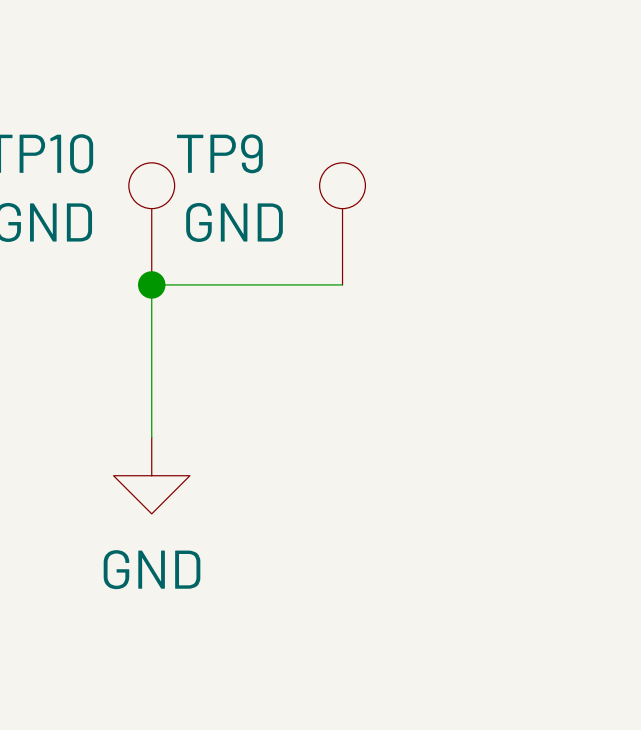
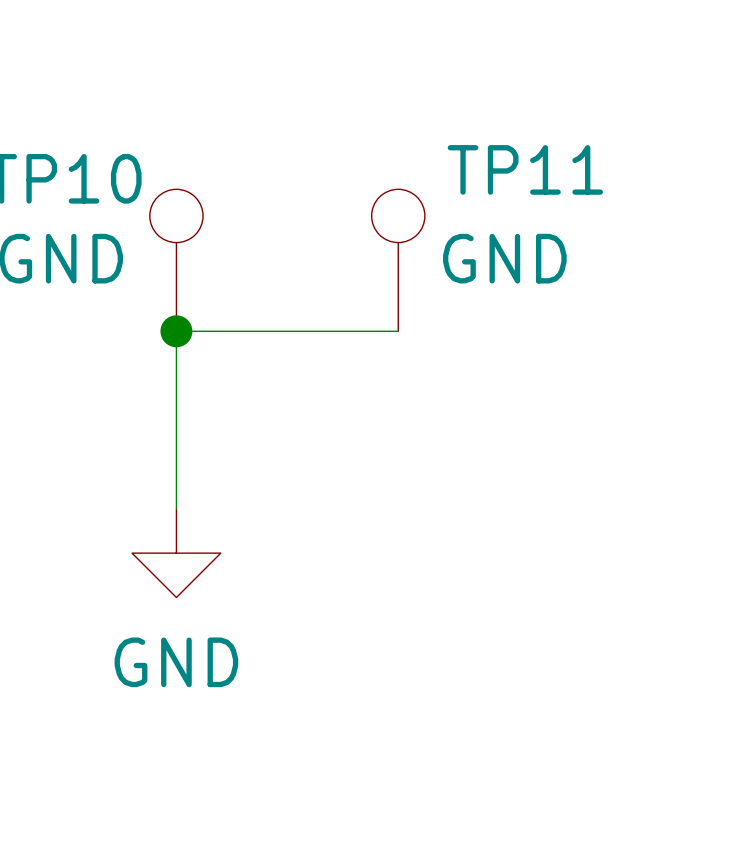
TP9 name: TP9 (219, 153) -> TP11 (525, 169)
TP9 value position: GND (234, 222) -> GND (504, 258)

